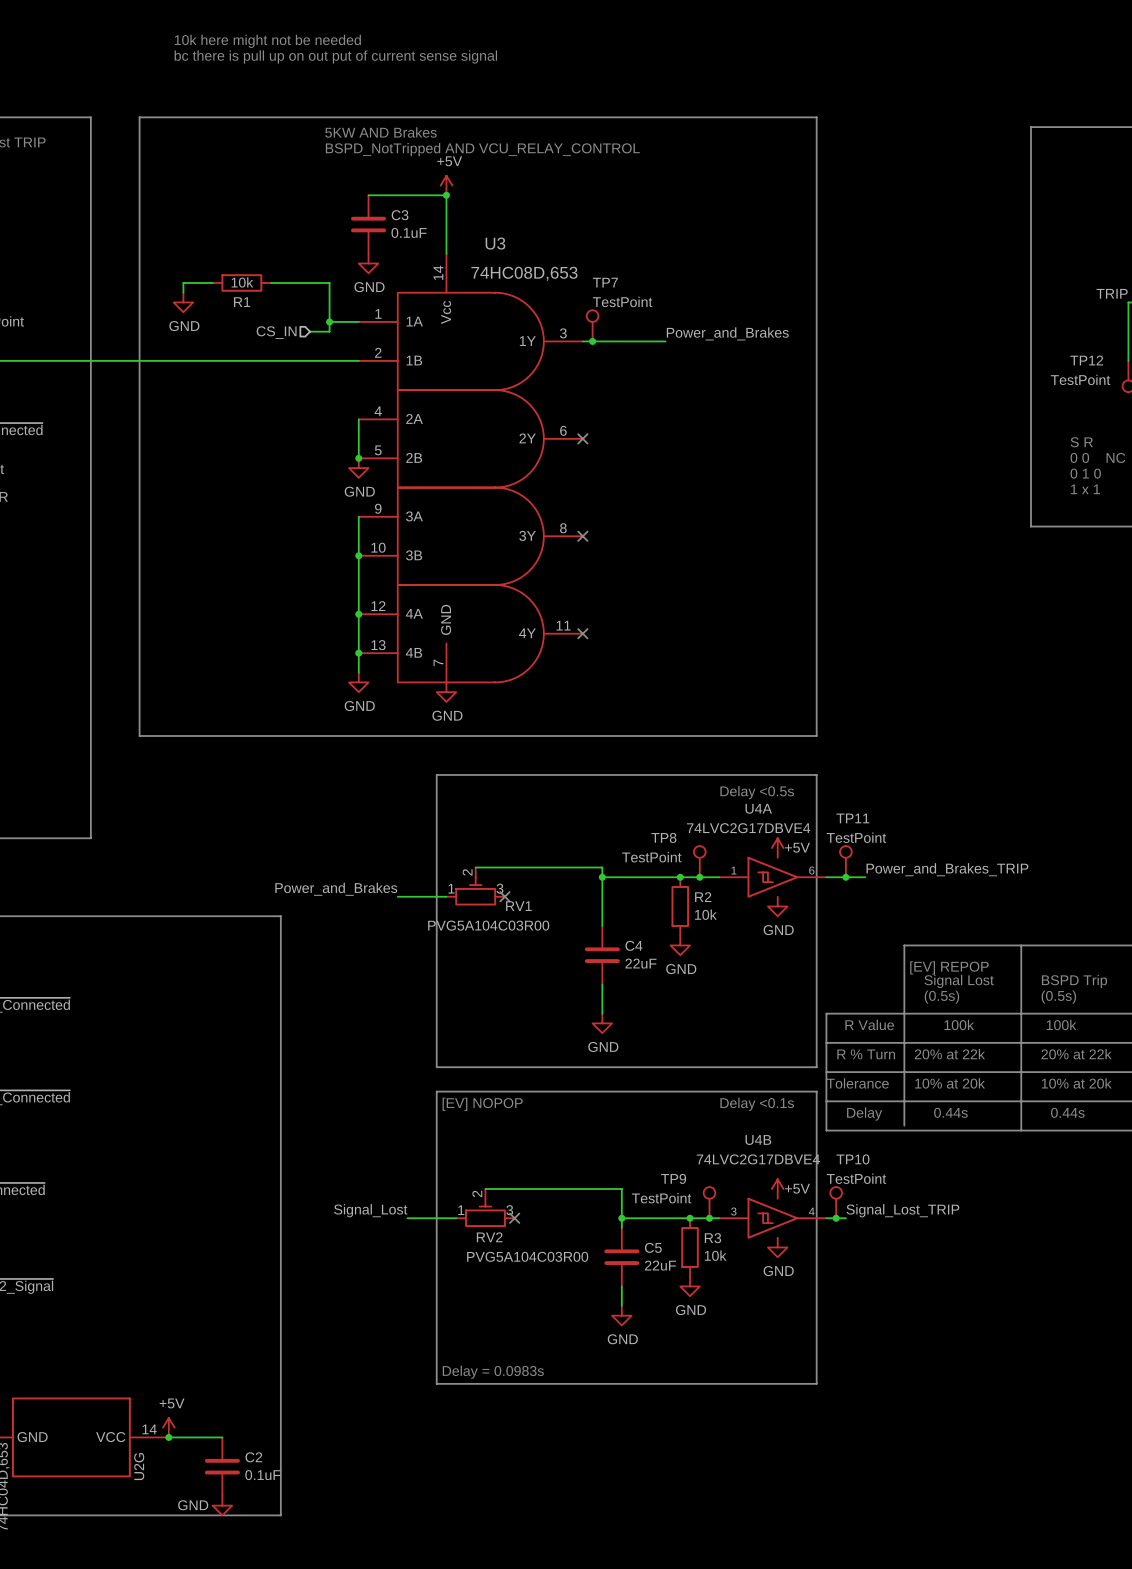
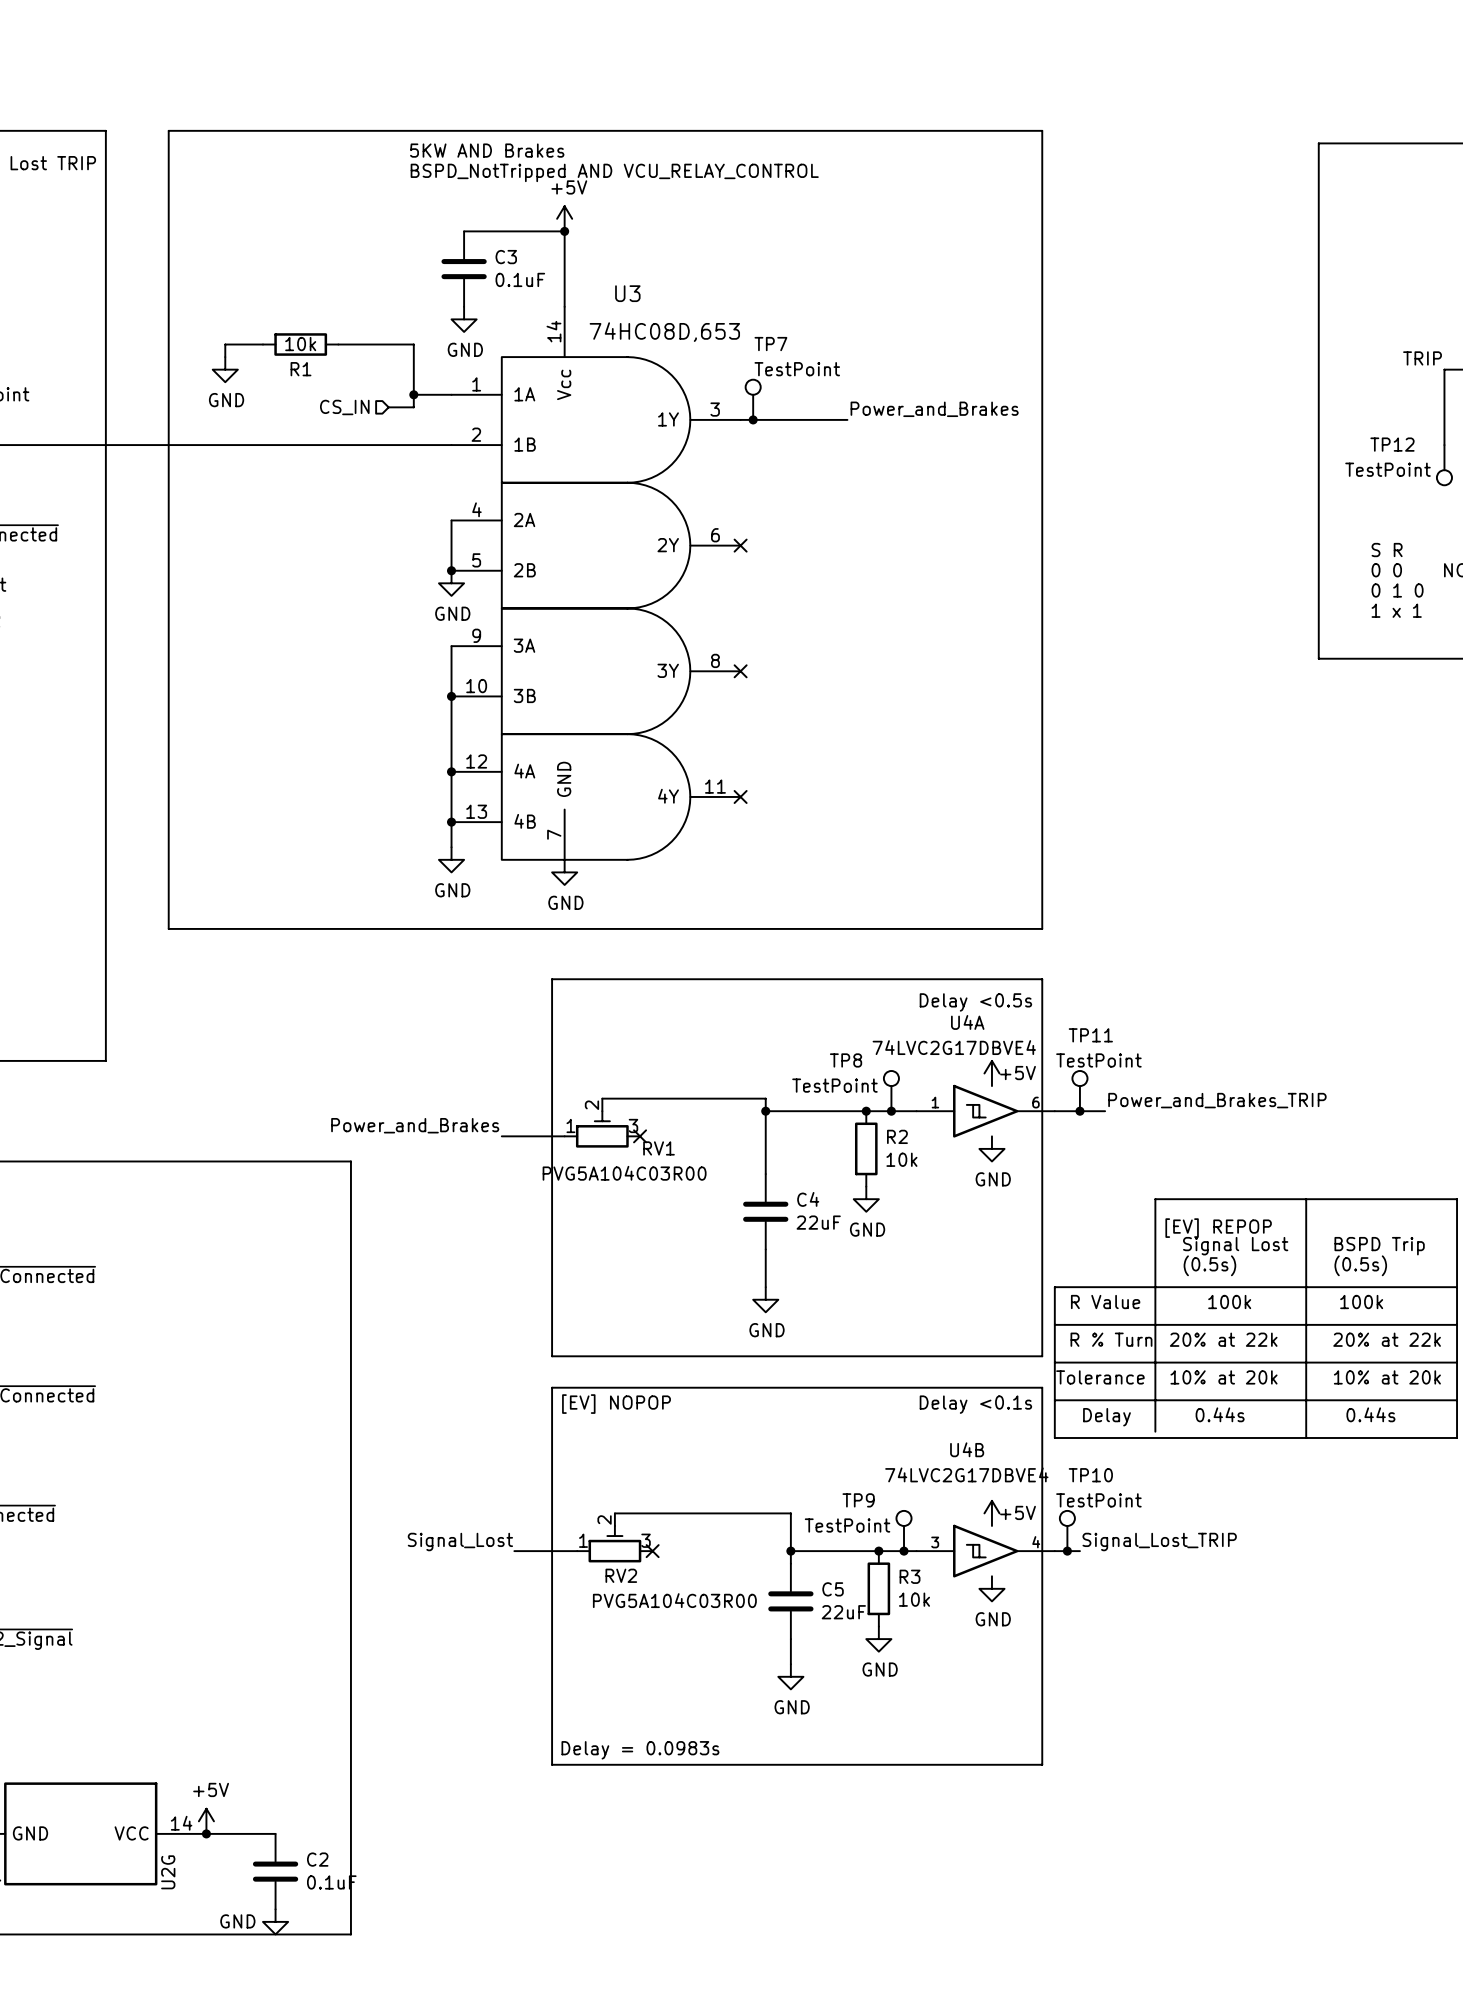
text: 10k here might not be needed (267, 41) -> none
text: bc there is pull up on out put of current sense signal (335, 57) -> none

